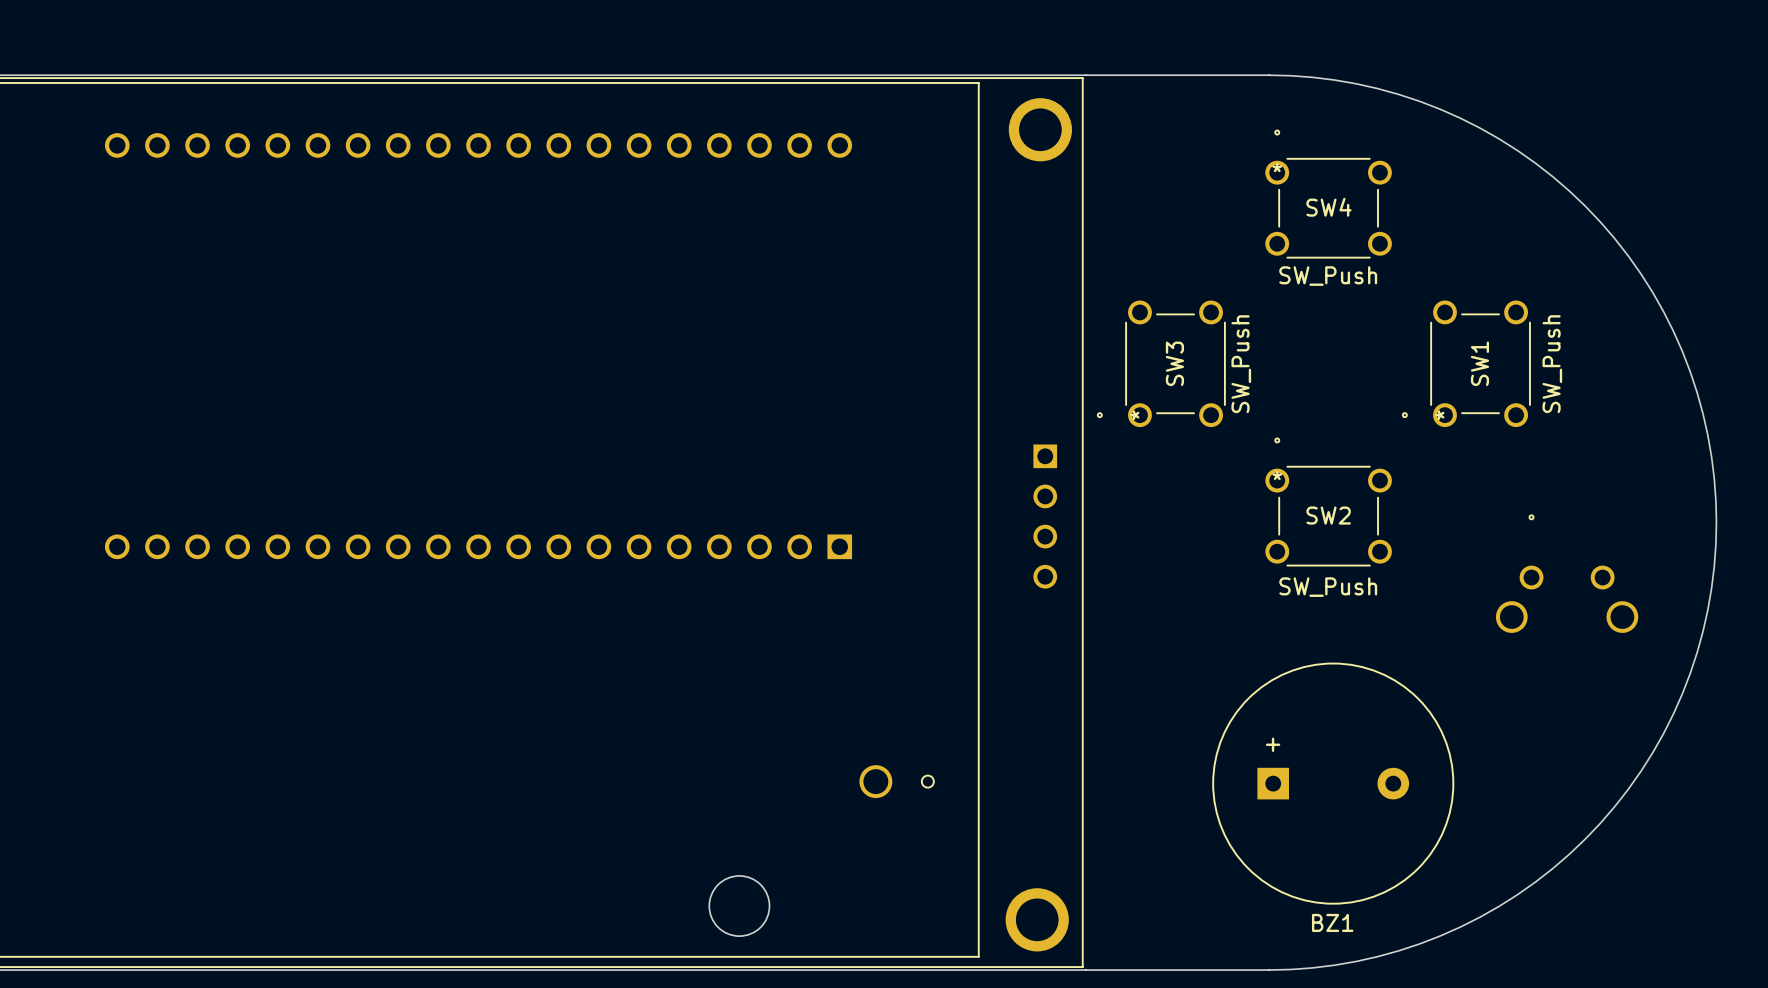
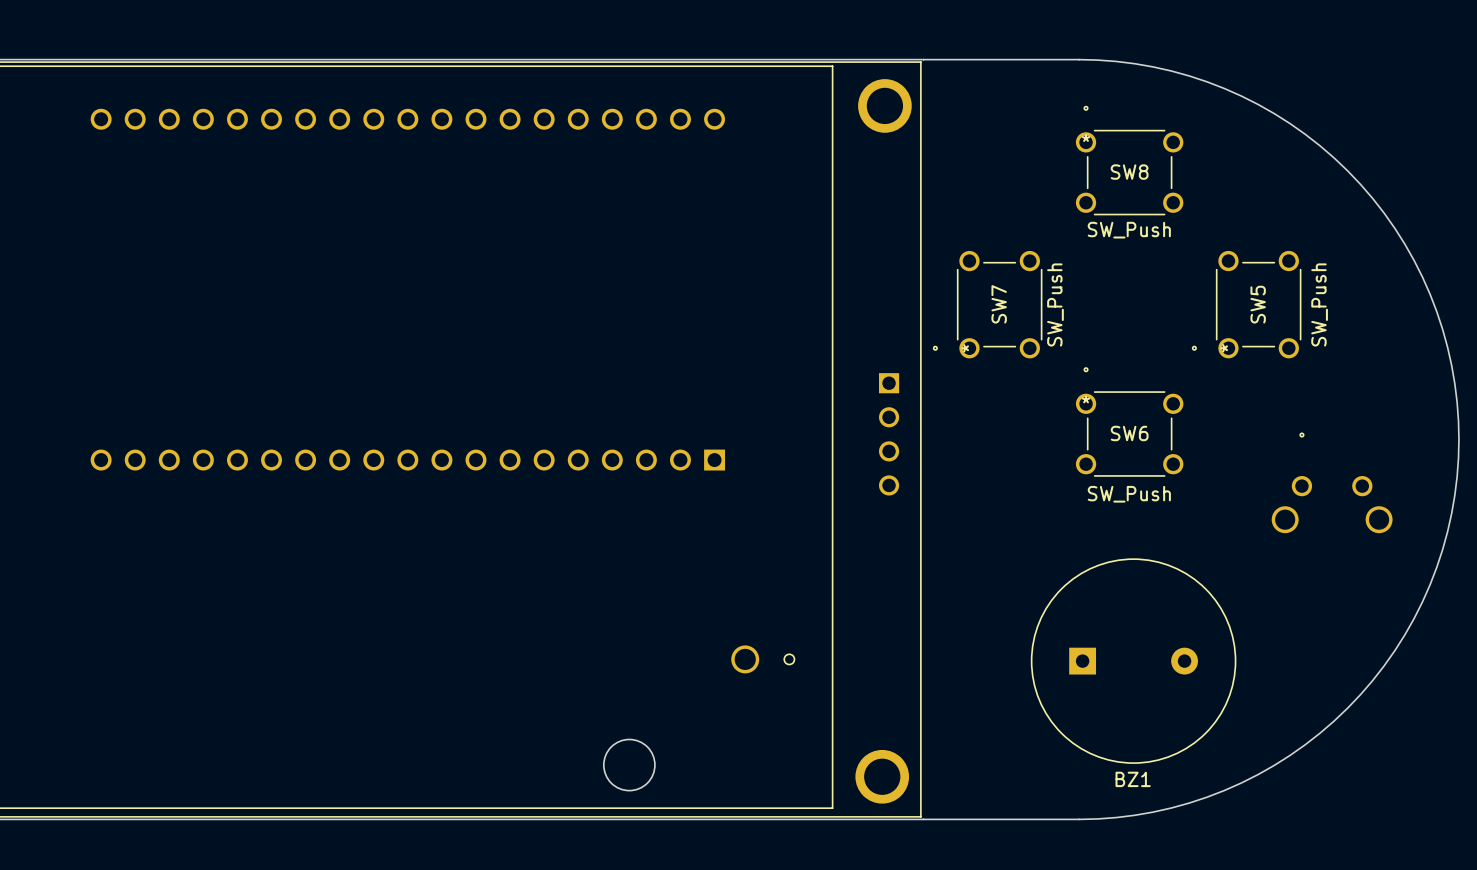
SW4 name: SW4 (1328, 207) -> SW8 (1129, 172)
SW3 name: SW3 (1174, 363) -> SW7 (999, 304)
SW1 name: SW1 (1479, 363) -> SW5 (1258, 304)
SW2 name: SW2 (1328, 515) -> SW6 (1129, 433)
BZ1 text: + (1273, 744) -> none

